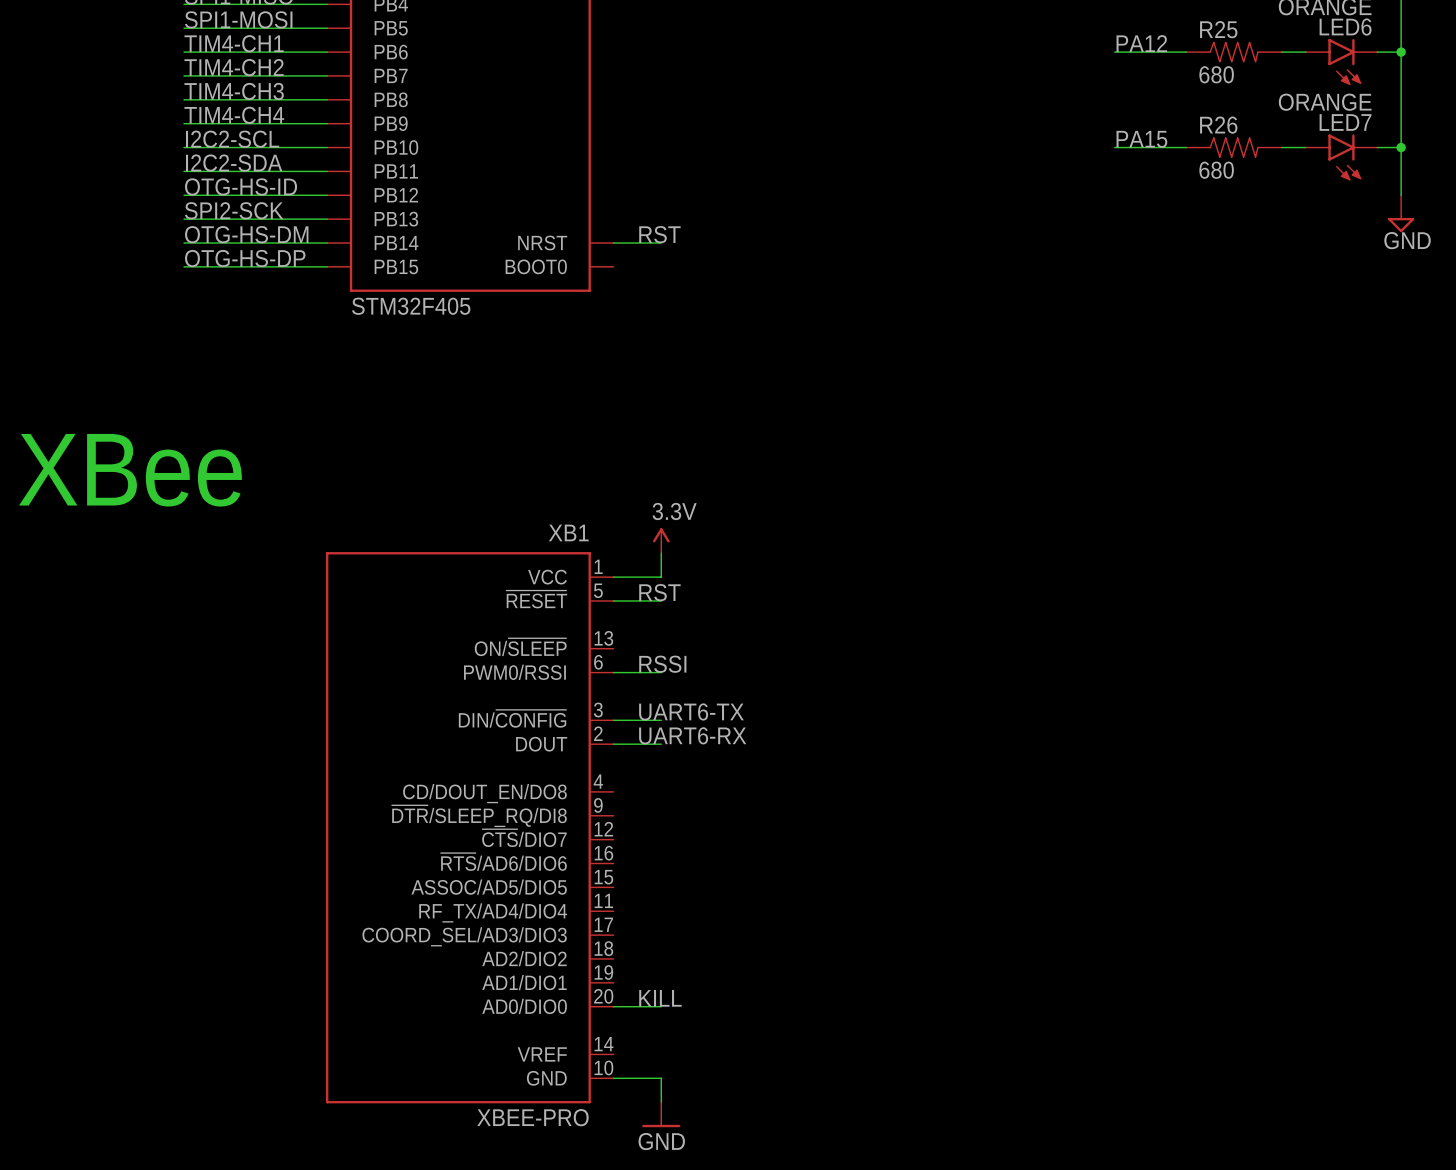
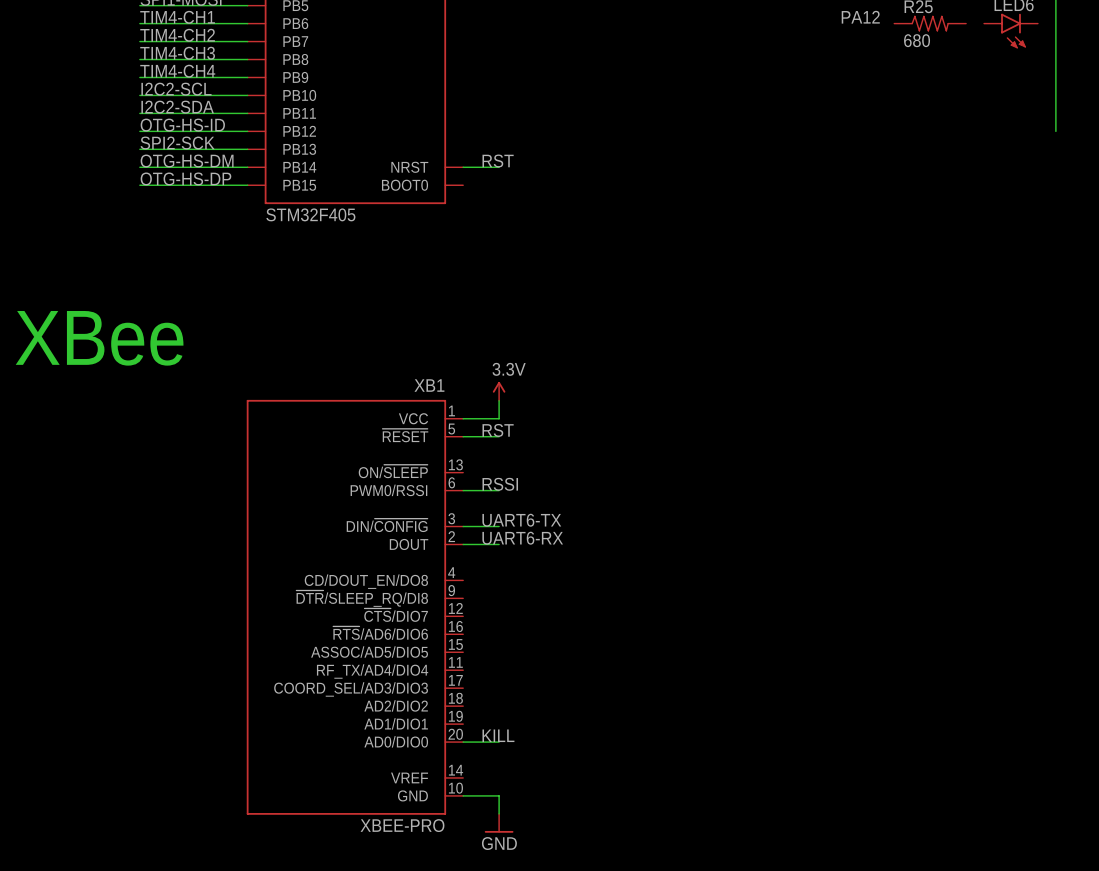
wire: (1114, 52) (1186, 52) -> none
wire: (1281, 52) (1305, 52) -> none
wire: (1377, 52) (1401, 52) -> none
junction: (1401, 52) -> none
label: PA15 (1141, 139) -> none
wire: (1114, 147) (1186, 147) -> none
R26: 680 (1234, 147) -> none
wire: (1281, 147) (1305, 147) -> none
wire: (1377, 147) (1401, 147) -> none
junction: (1401, 147) -> none
LED7: ORANGE (1341, 157) -> none
power symbol: GND (1401, 213) -> none

